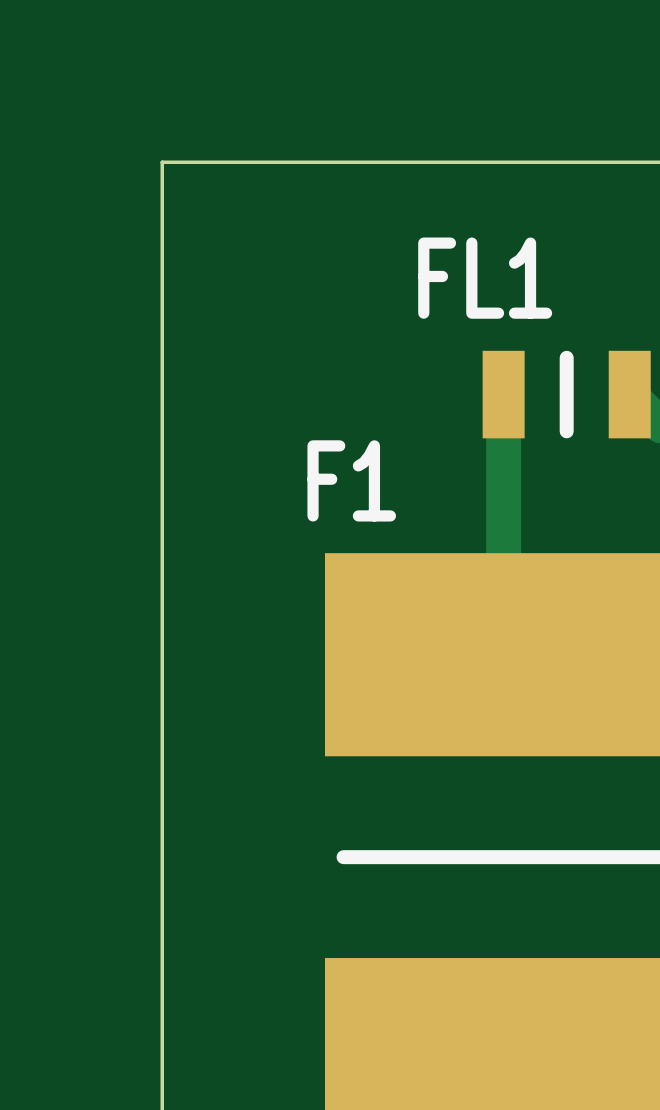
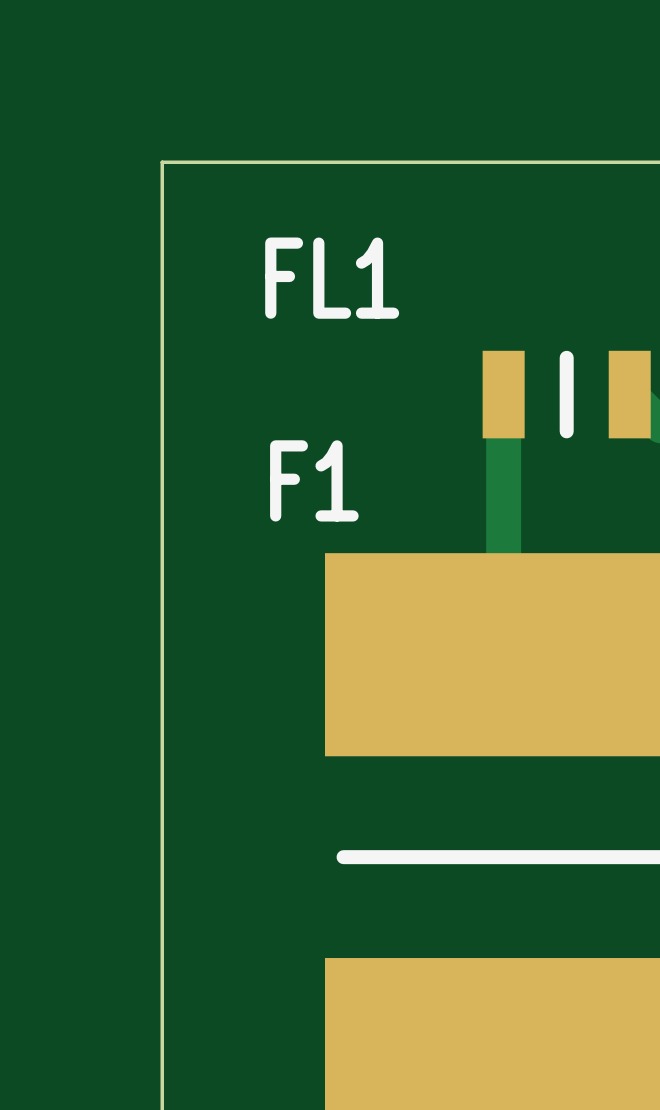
FL1 name position: FL1 (485, 278) -> FL1 (332, 278)
F1 name position: F1 (351, 480) -> F1 (314, 480)

